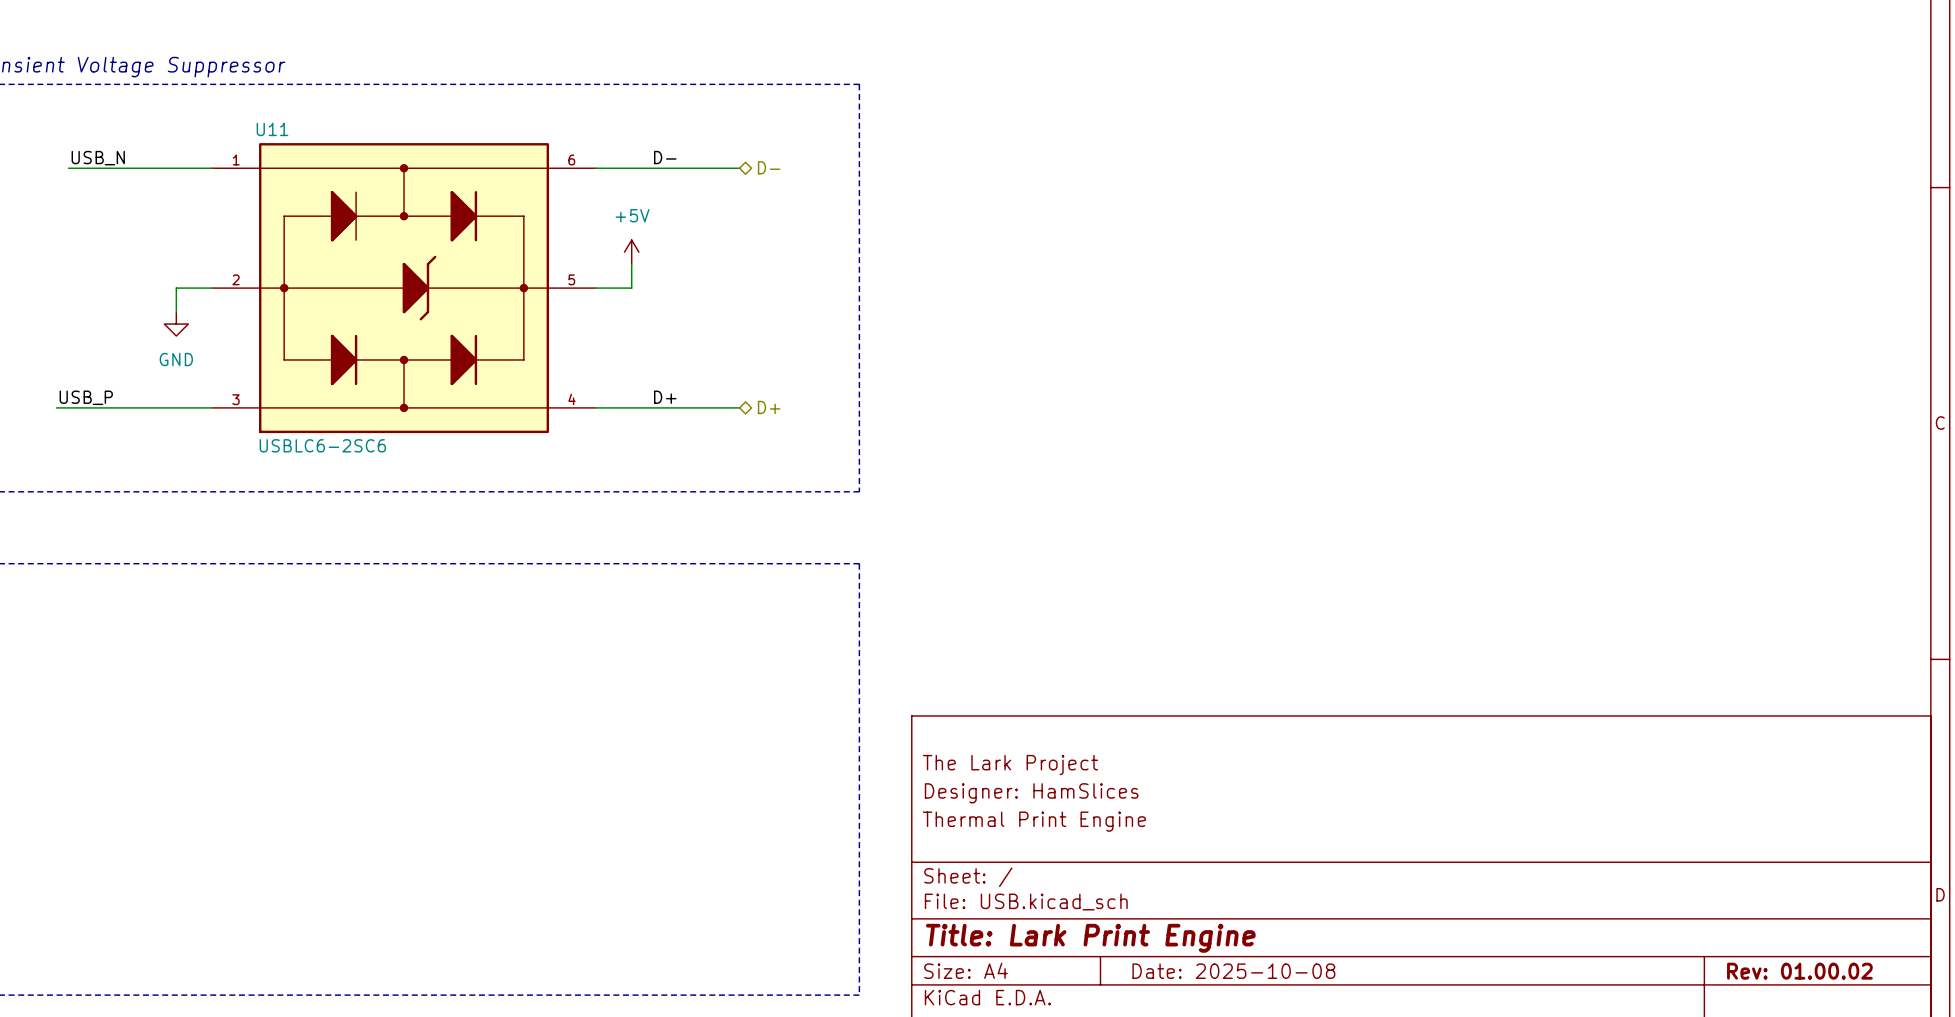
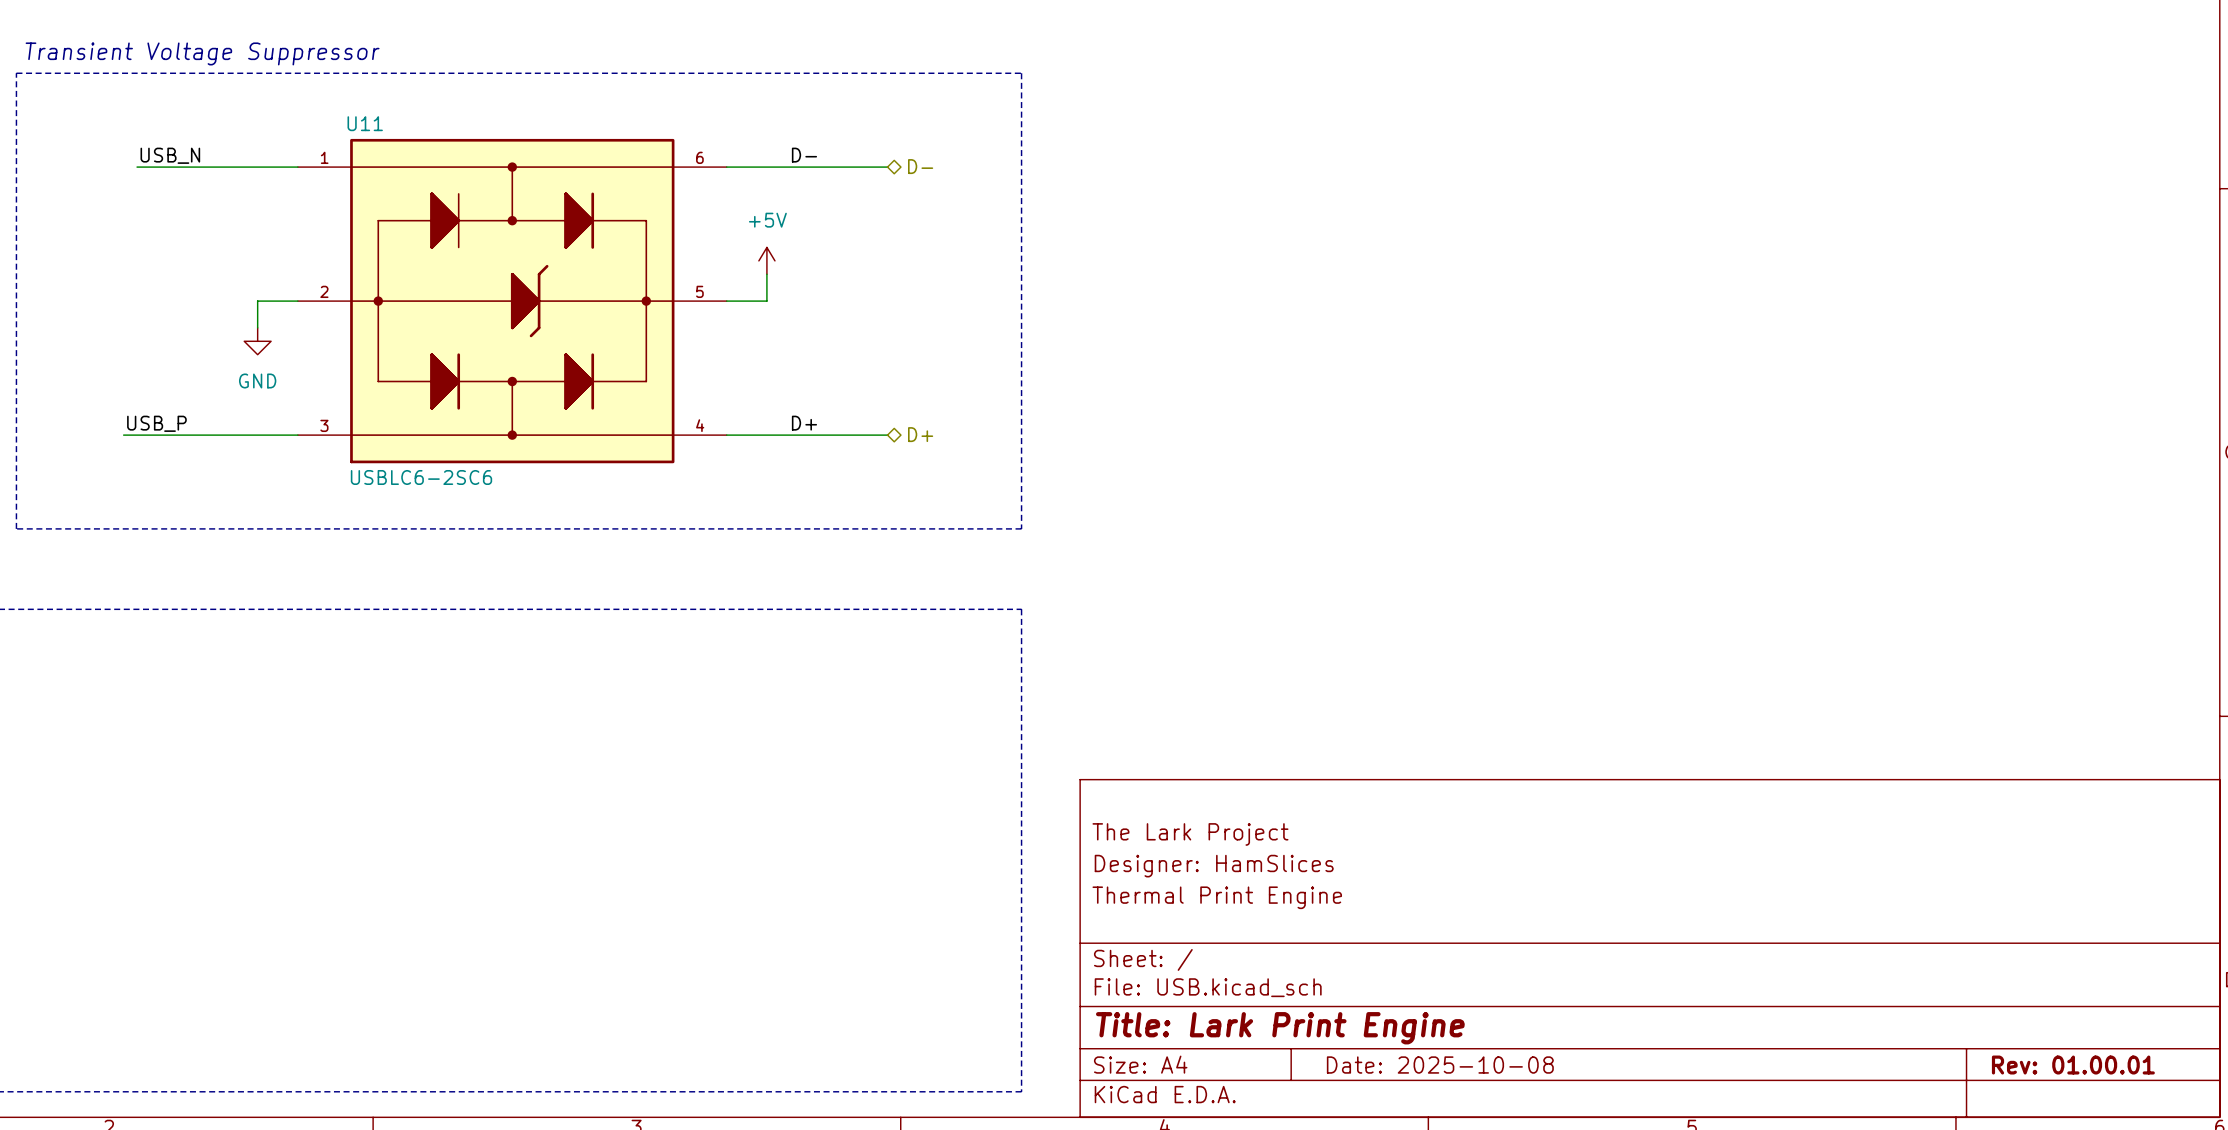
title block: Rev: 01.00.02 (1799, 971) -> Rev: 01.00.01 (2073, 1065)

